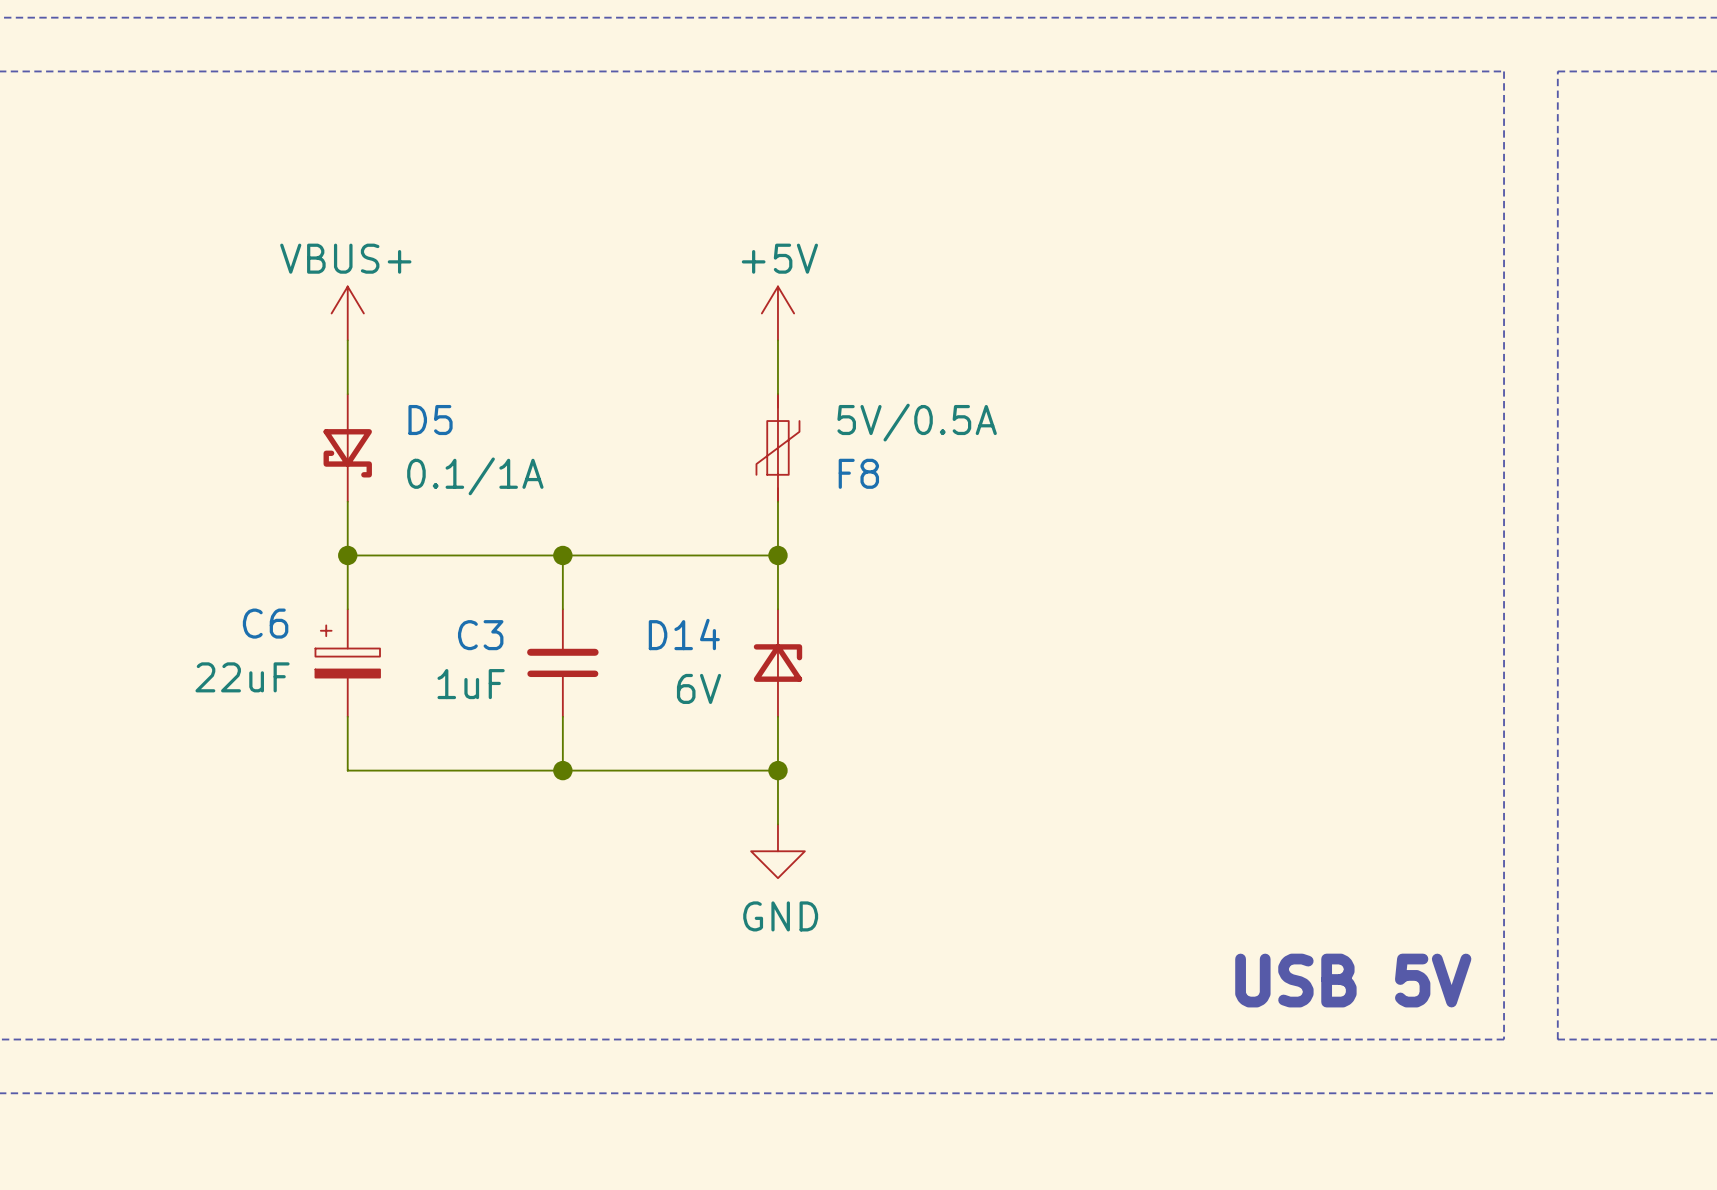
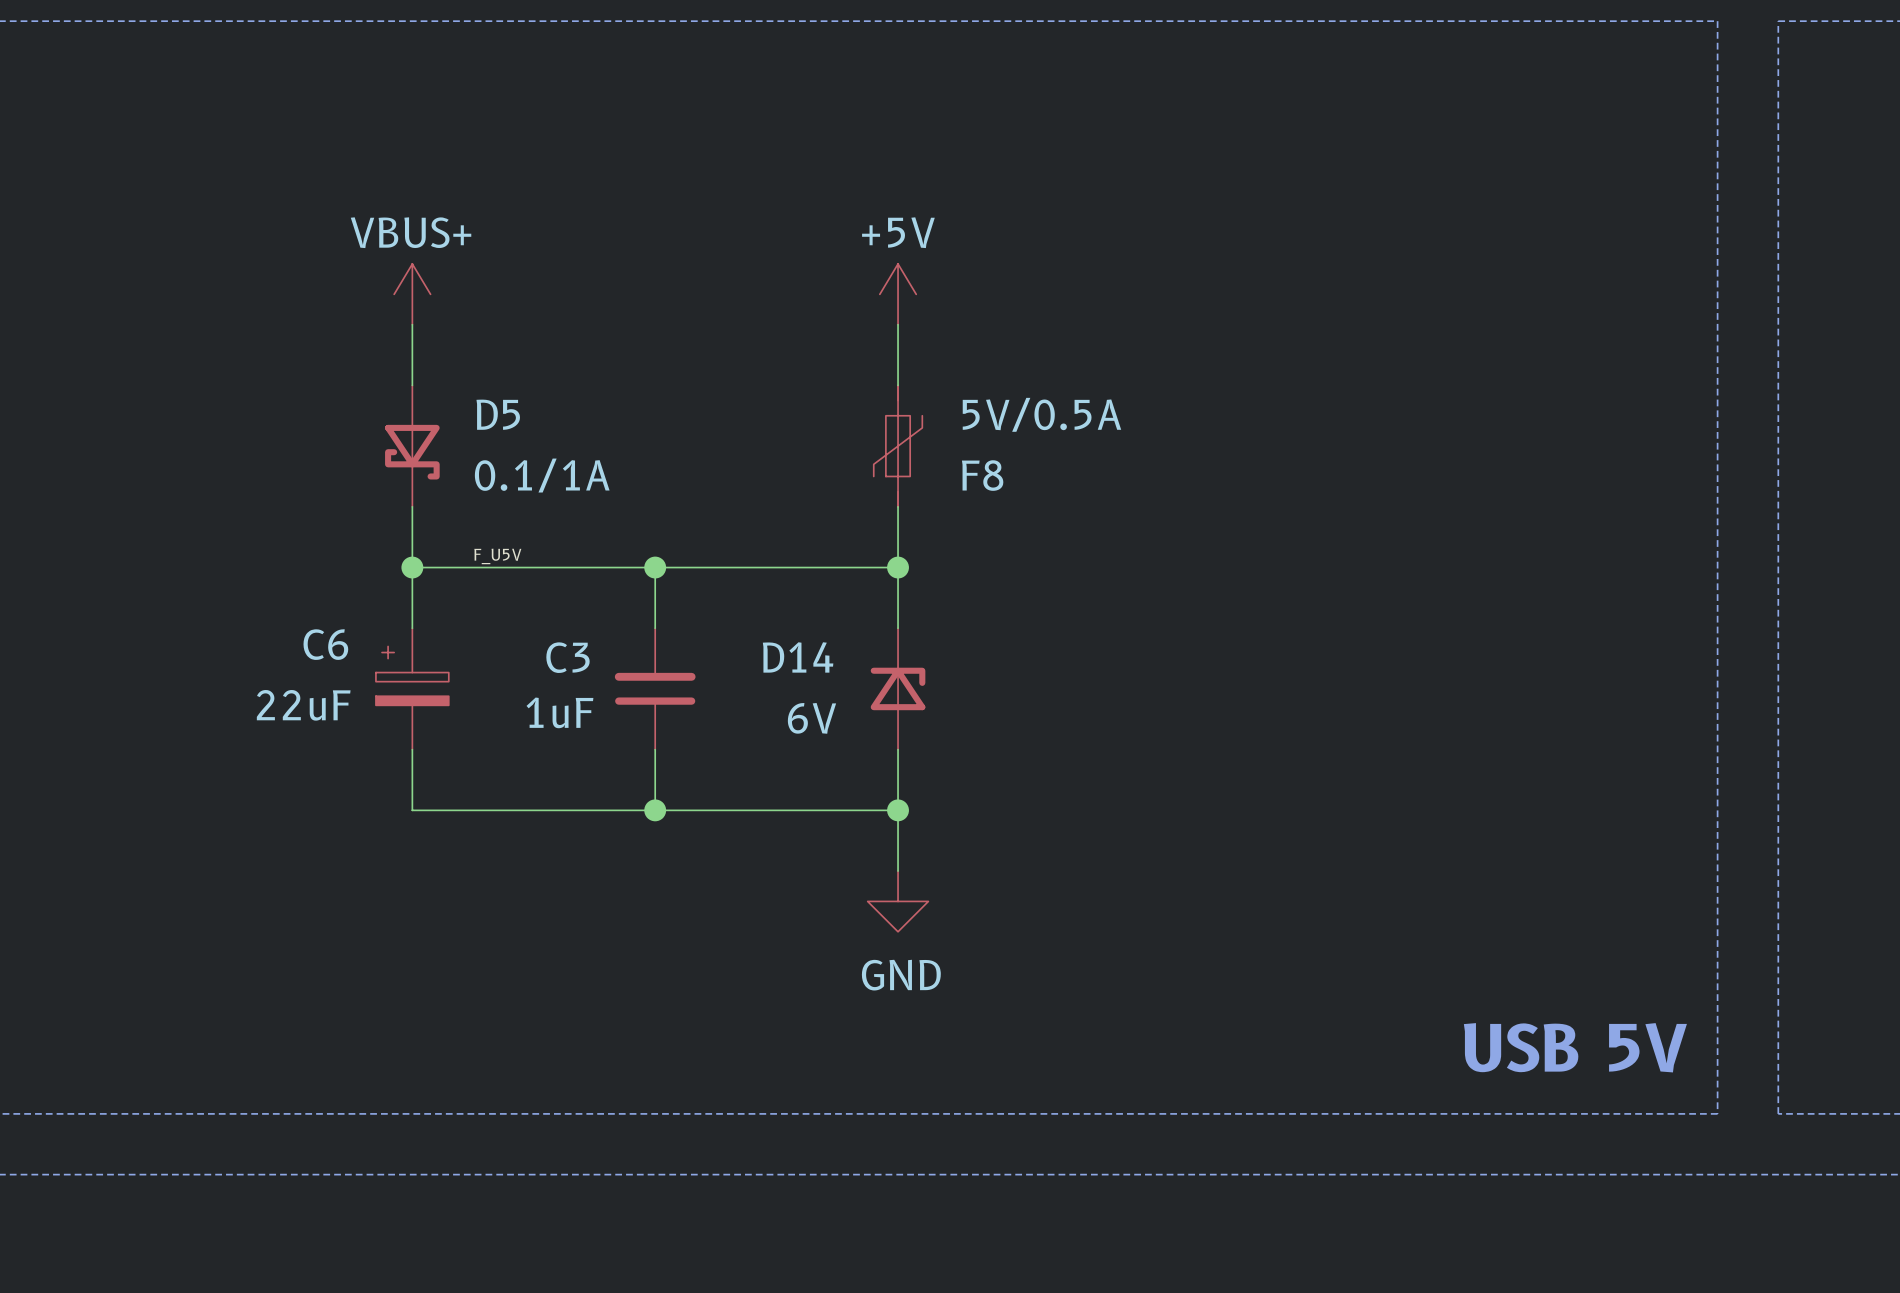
label: none -> F_U5V (497, 556)

